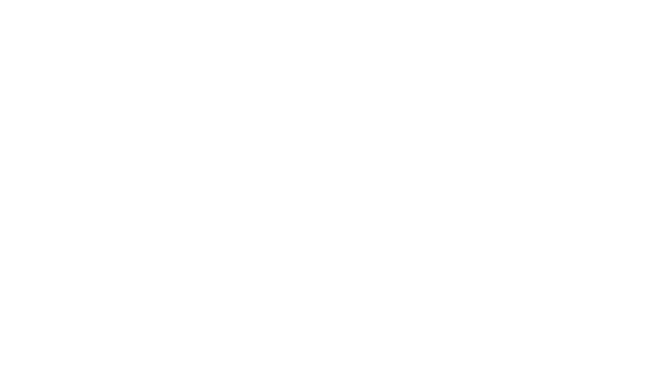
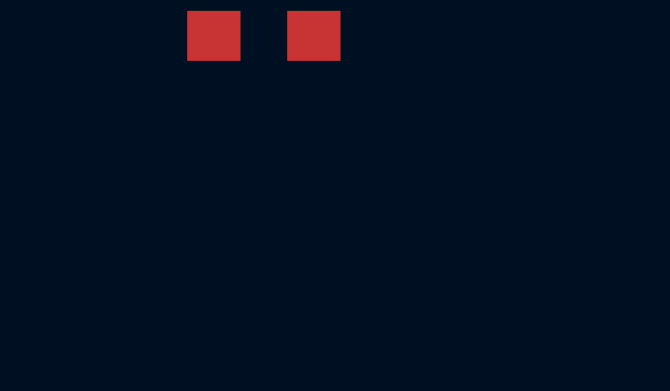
part: none -> (263, 35)

